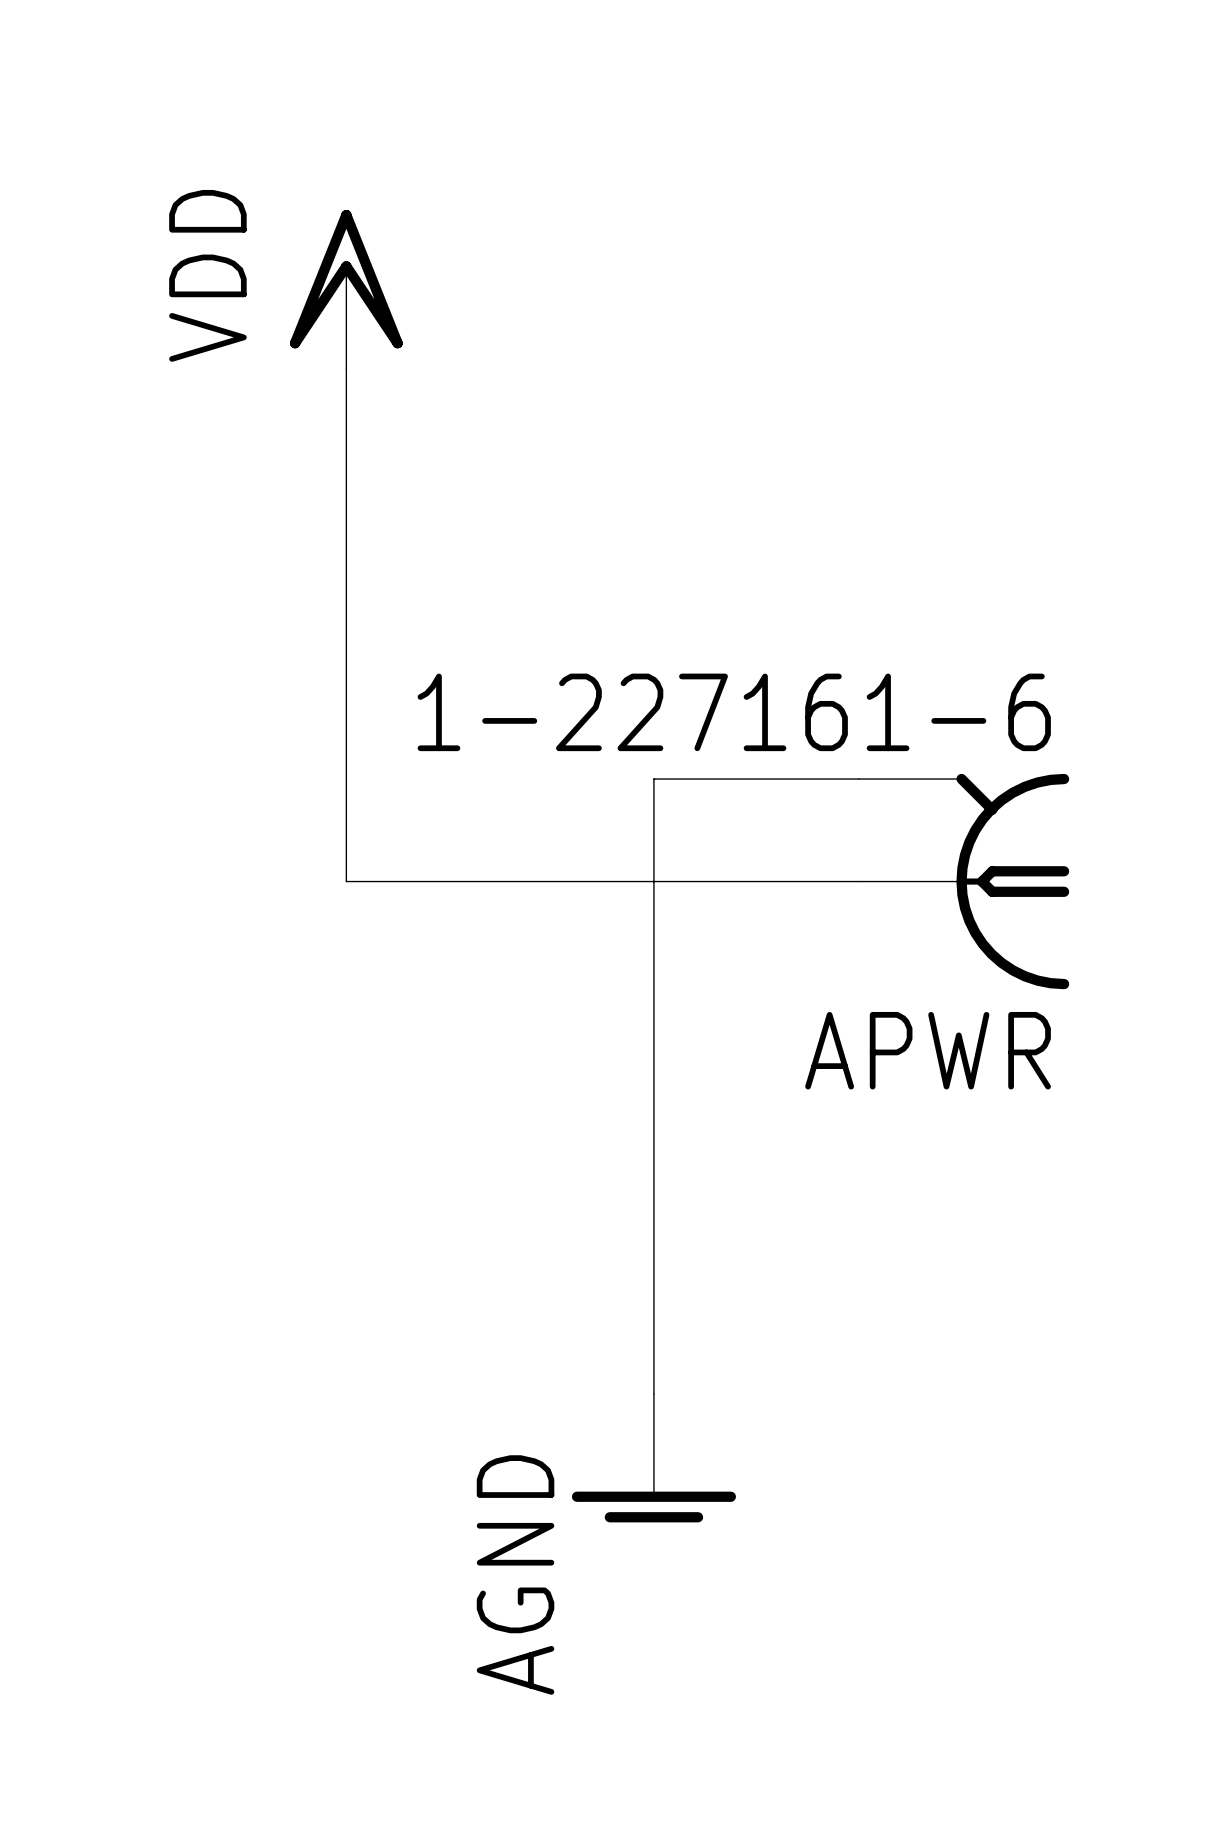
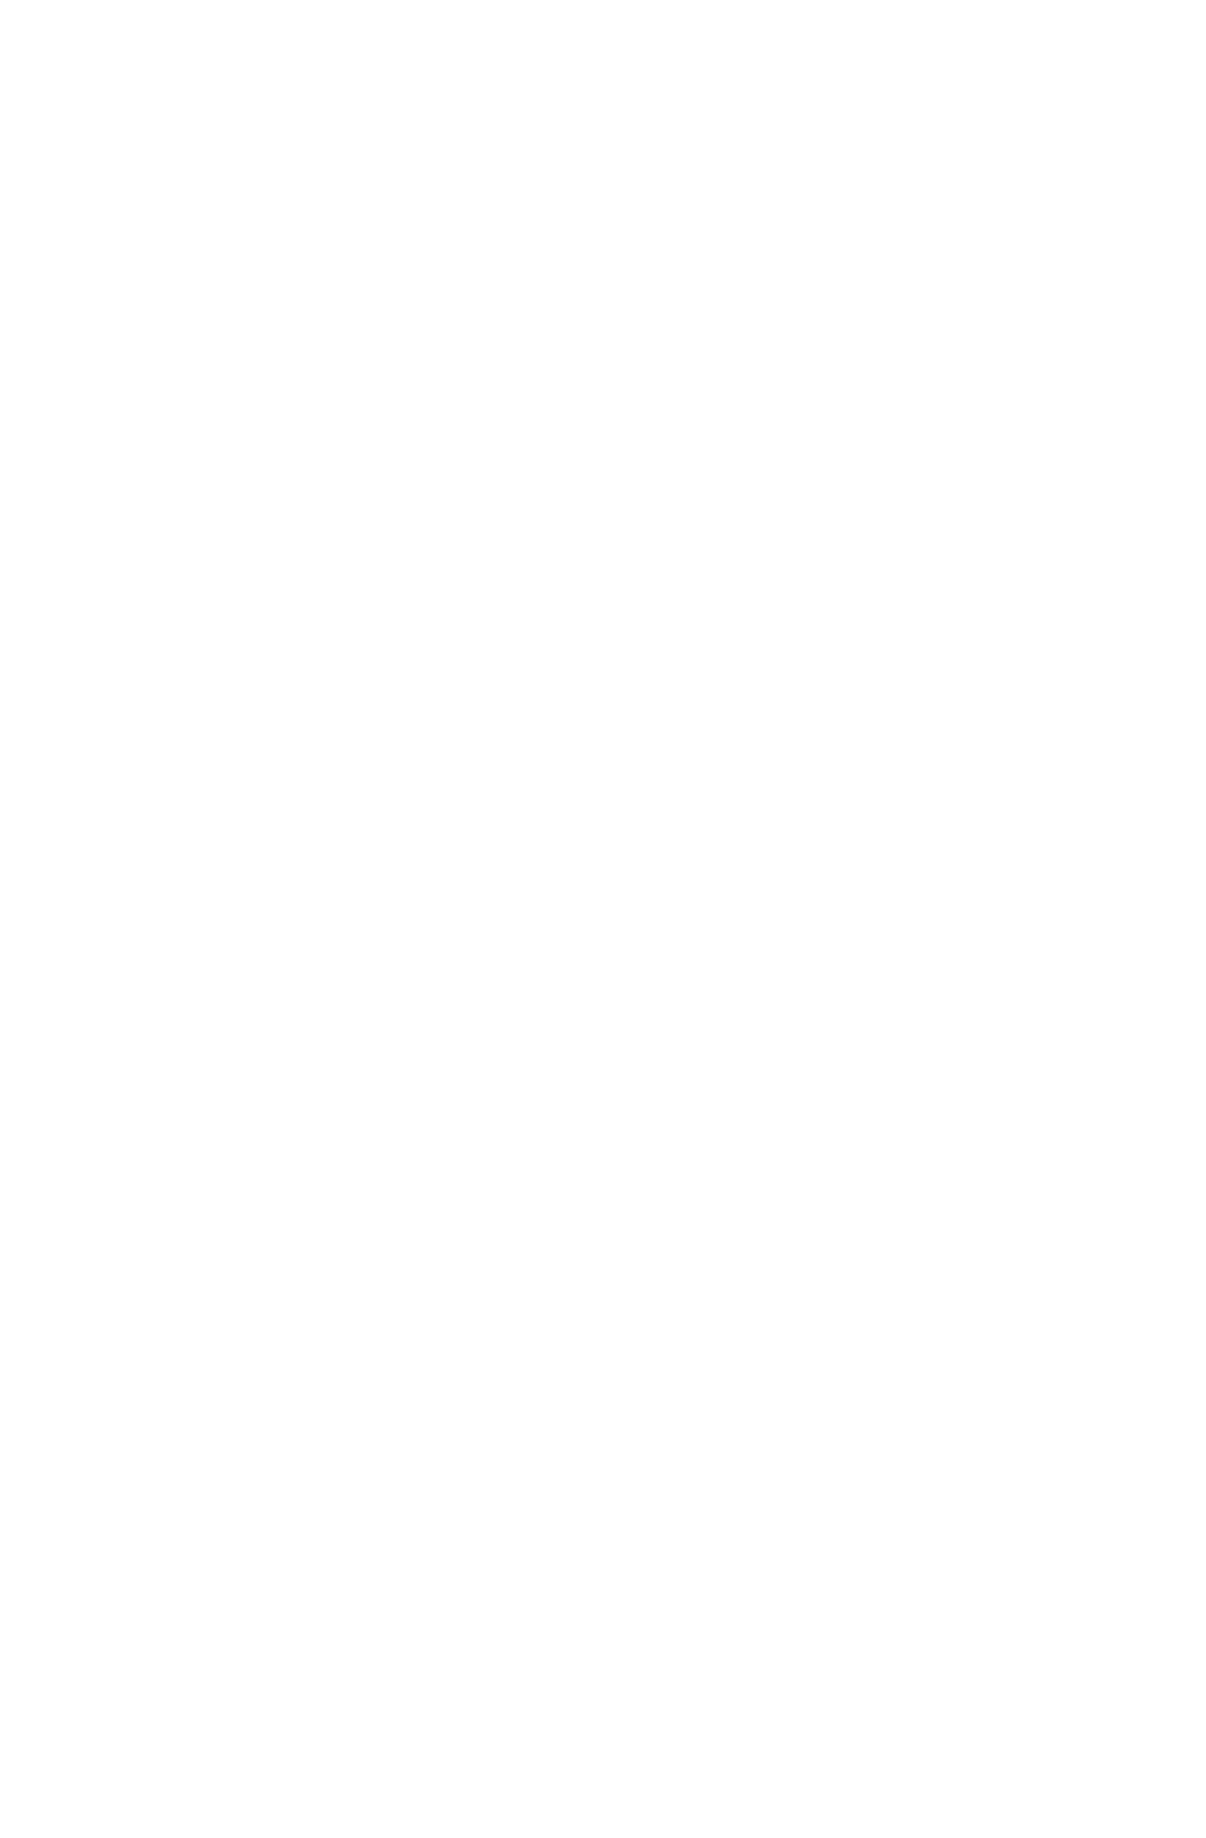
power symbol: VDD (346, 289) -> none
wire: (346, 368) (346, 881) (859, 881) -> none
wire: (859, 779) (653, 779) (653, 1394) -> none
APWR: 1-227161-6 (964, 881) -> none
power symbol: AGND (653, 1458) -> none

